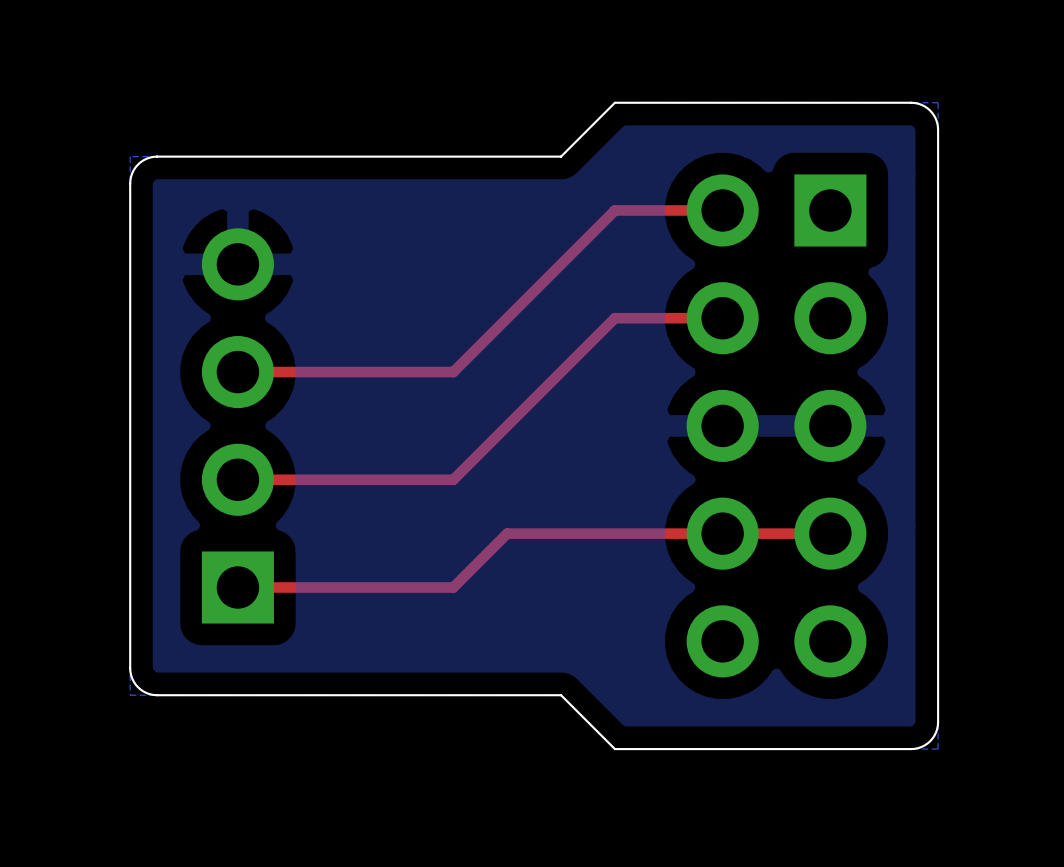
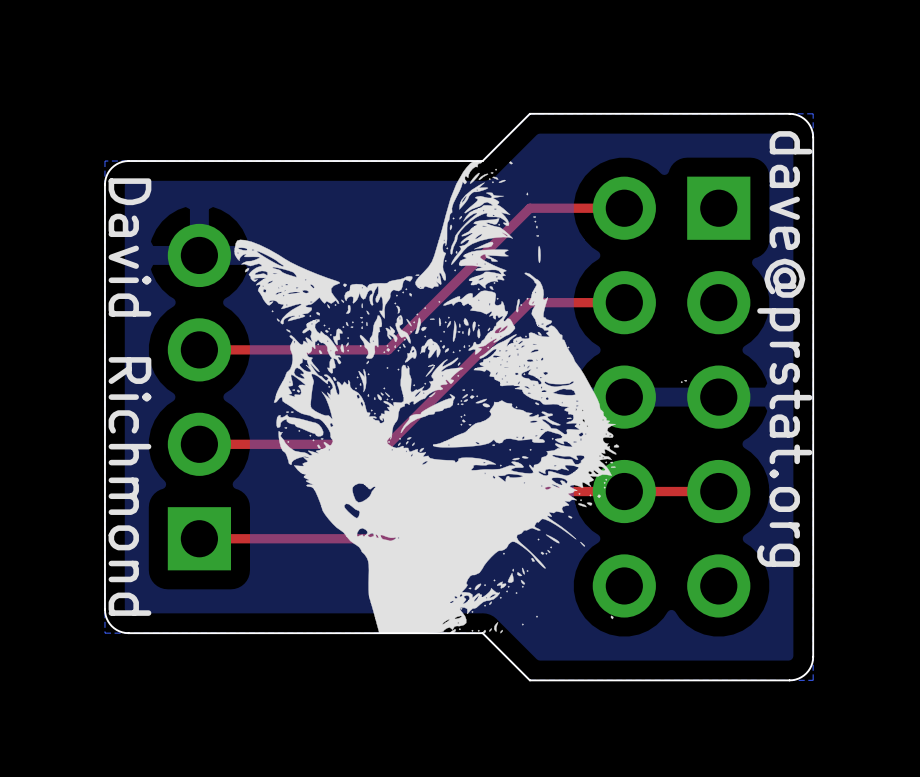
drawing: none -> [234, 160, 687, 634]
text: none -> dave@prstat.org (784, 349)
text: none -> David Richmond (129, 397)

